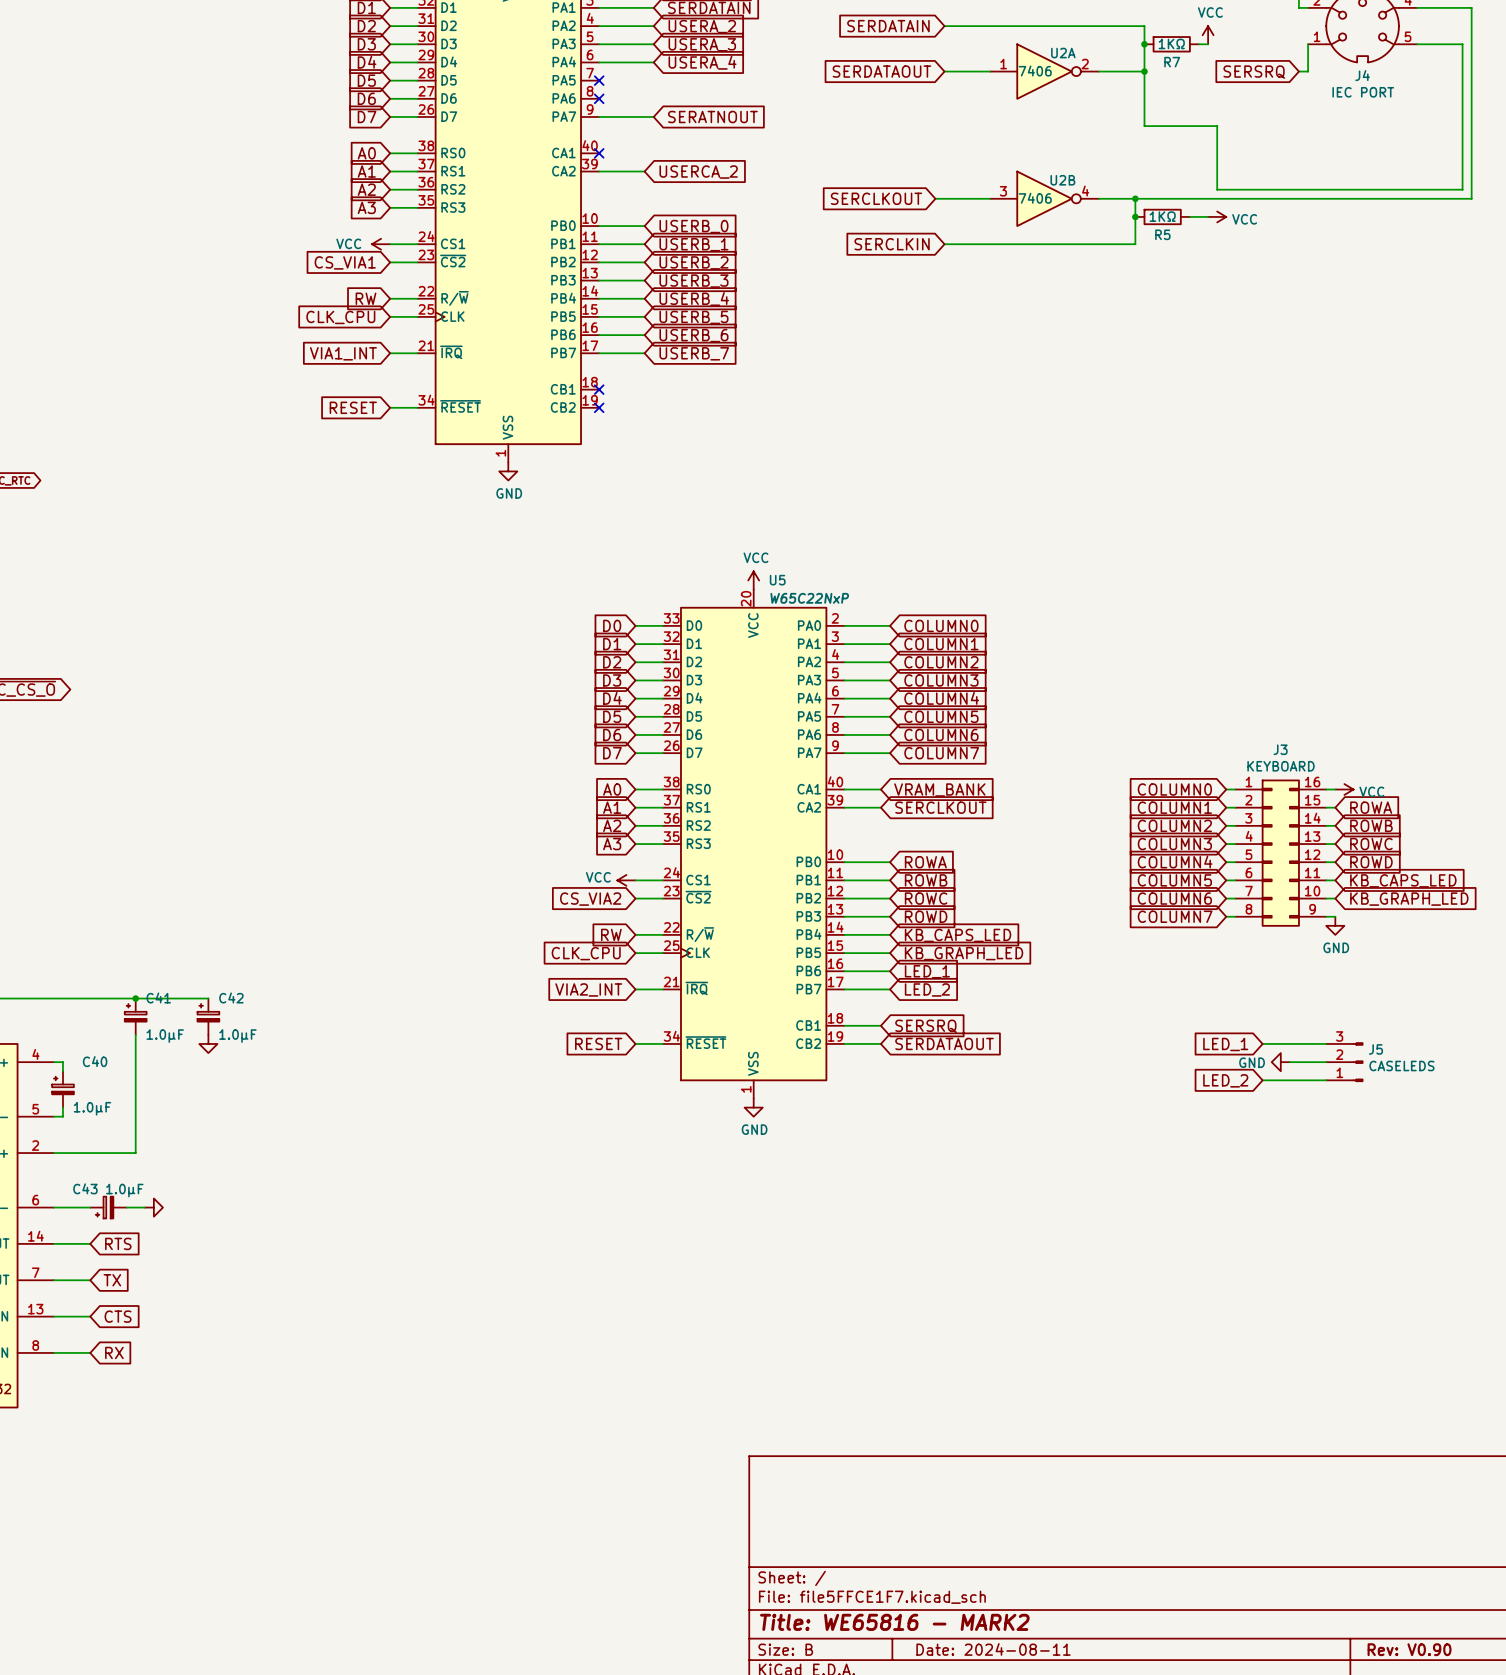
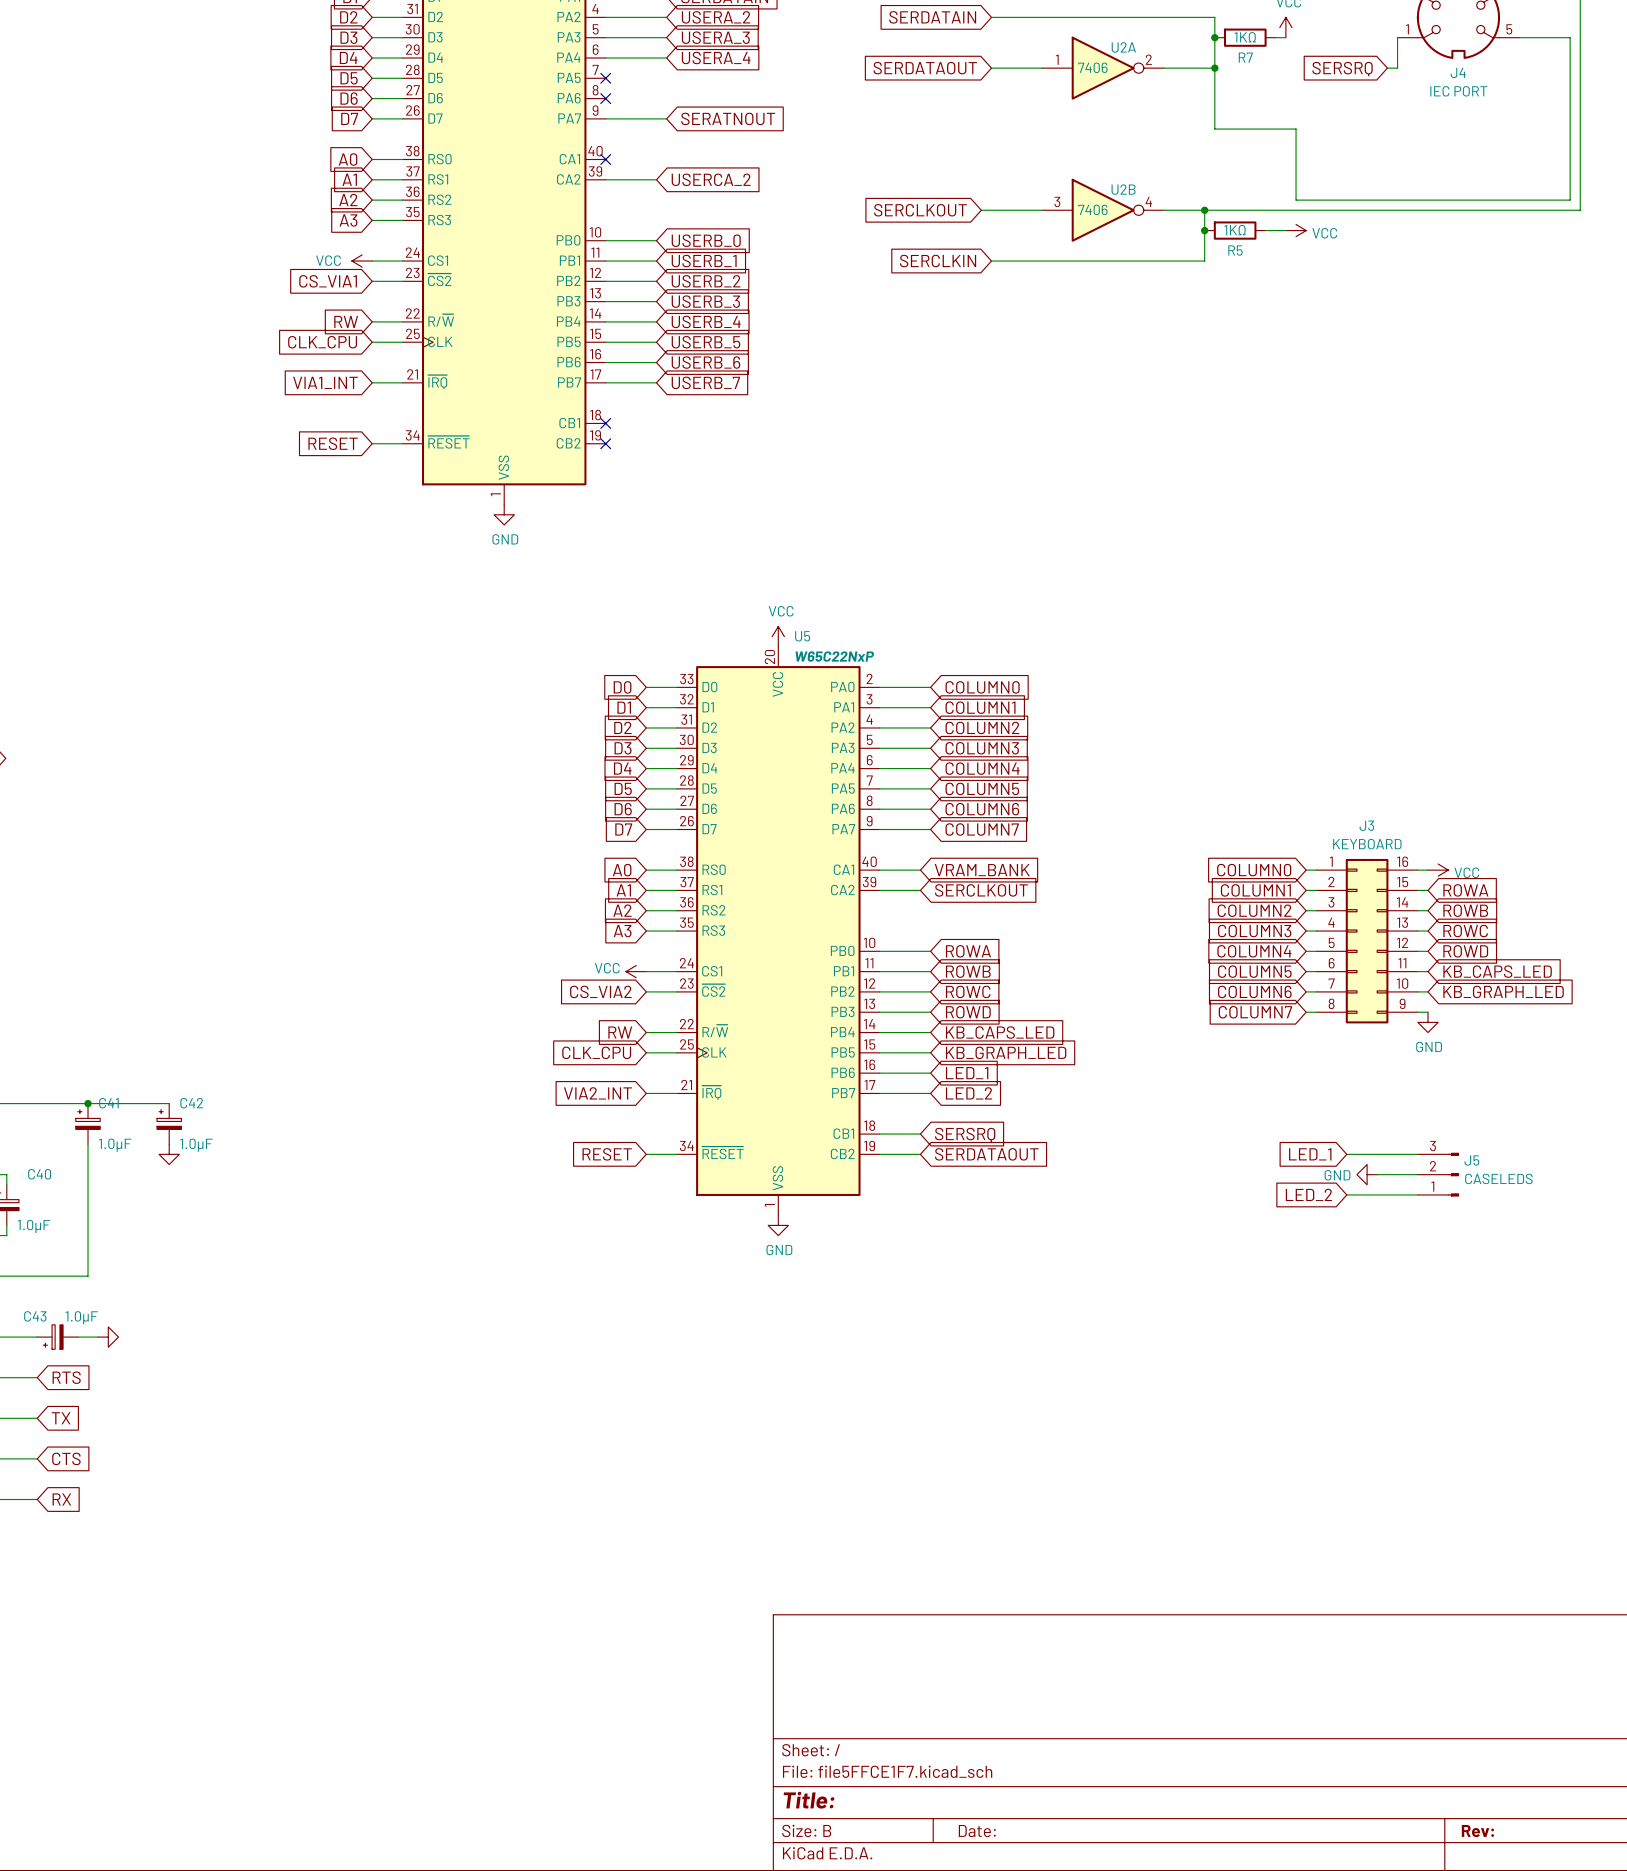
title block: Title: WE65816 - MARK2 (894, 1622) -> Title: (809, 1800)
title block: Date: 2024-08-11 (993, 1649) -> Date: (977, 1831)
title block: Rev: V0.90 (1409, 1649) -> Rev: (1477, 1831)

